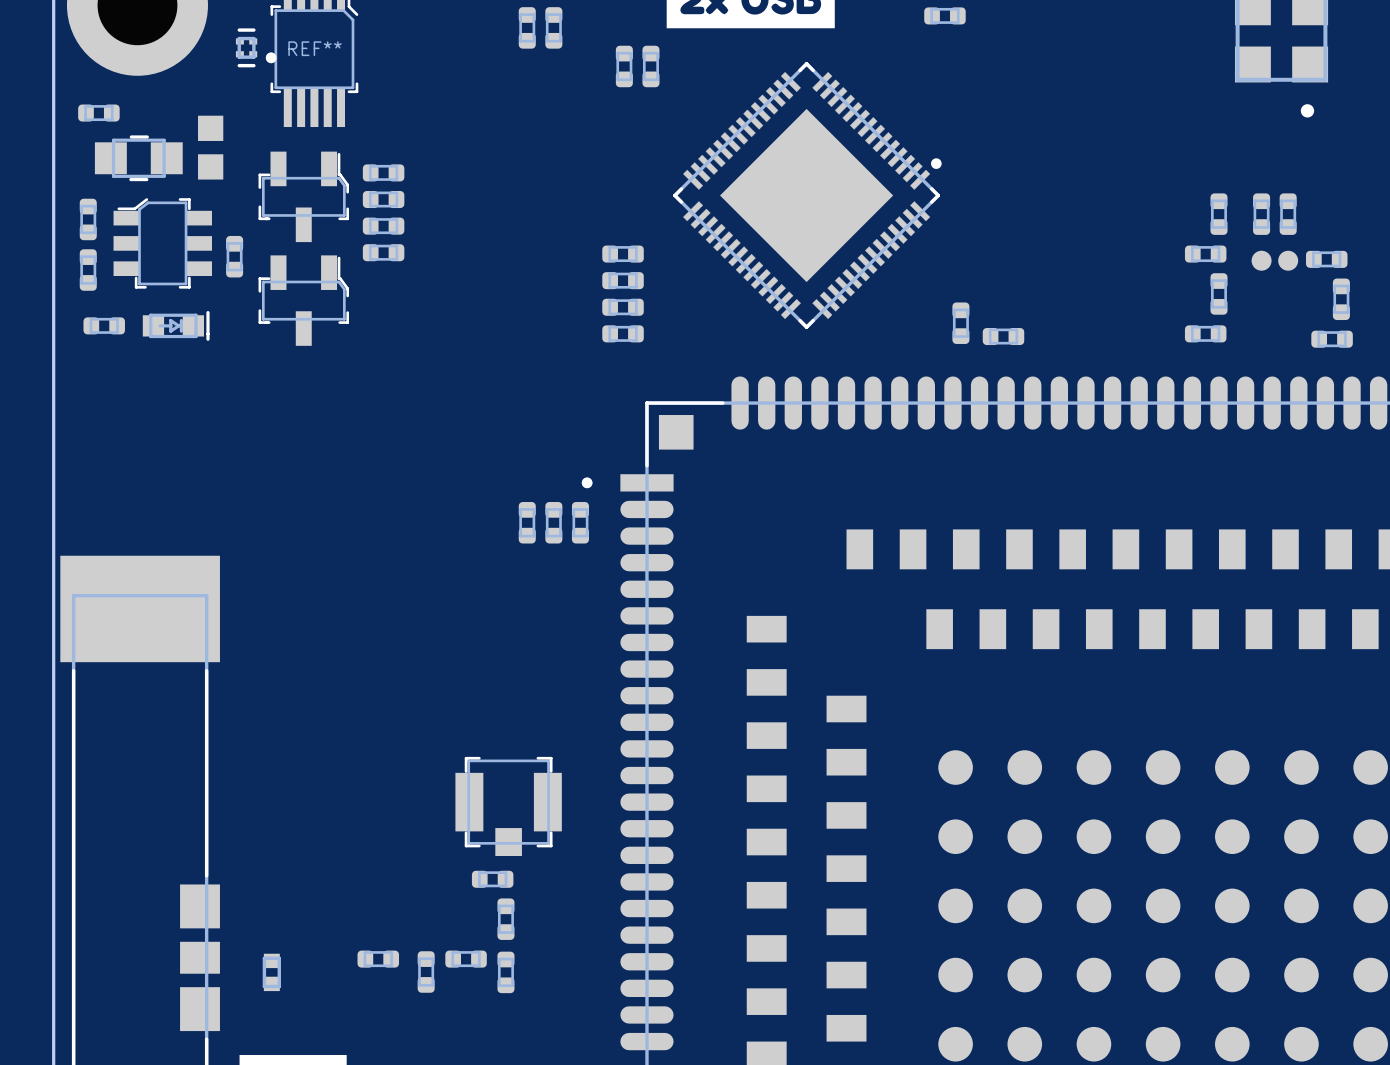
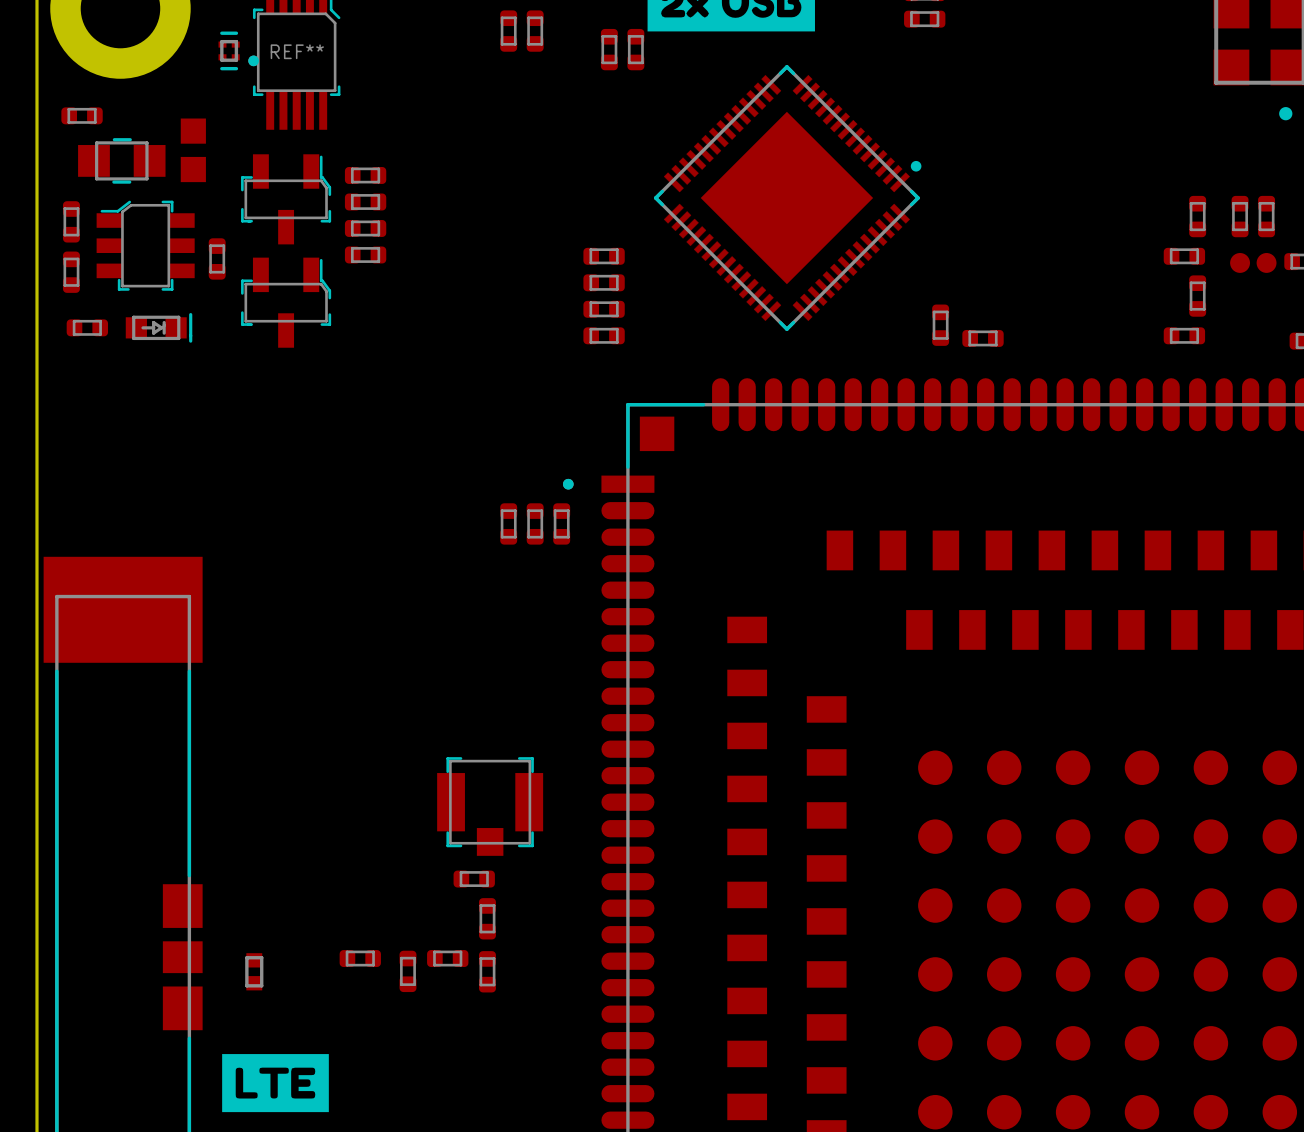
part: none -> (609, 49)
part: none -> (635, 49)
part: (624, 66) -> none
part: (650, 66) -> none

